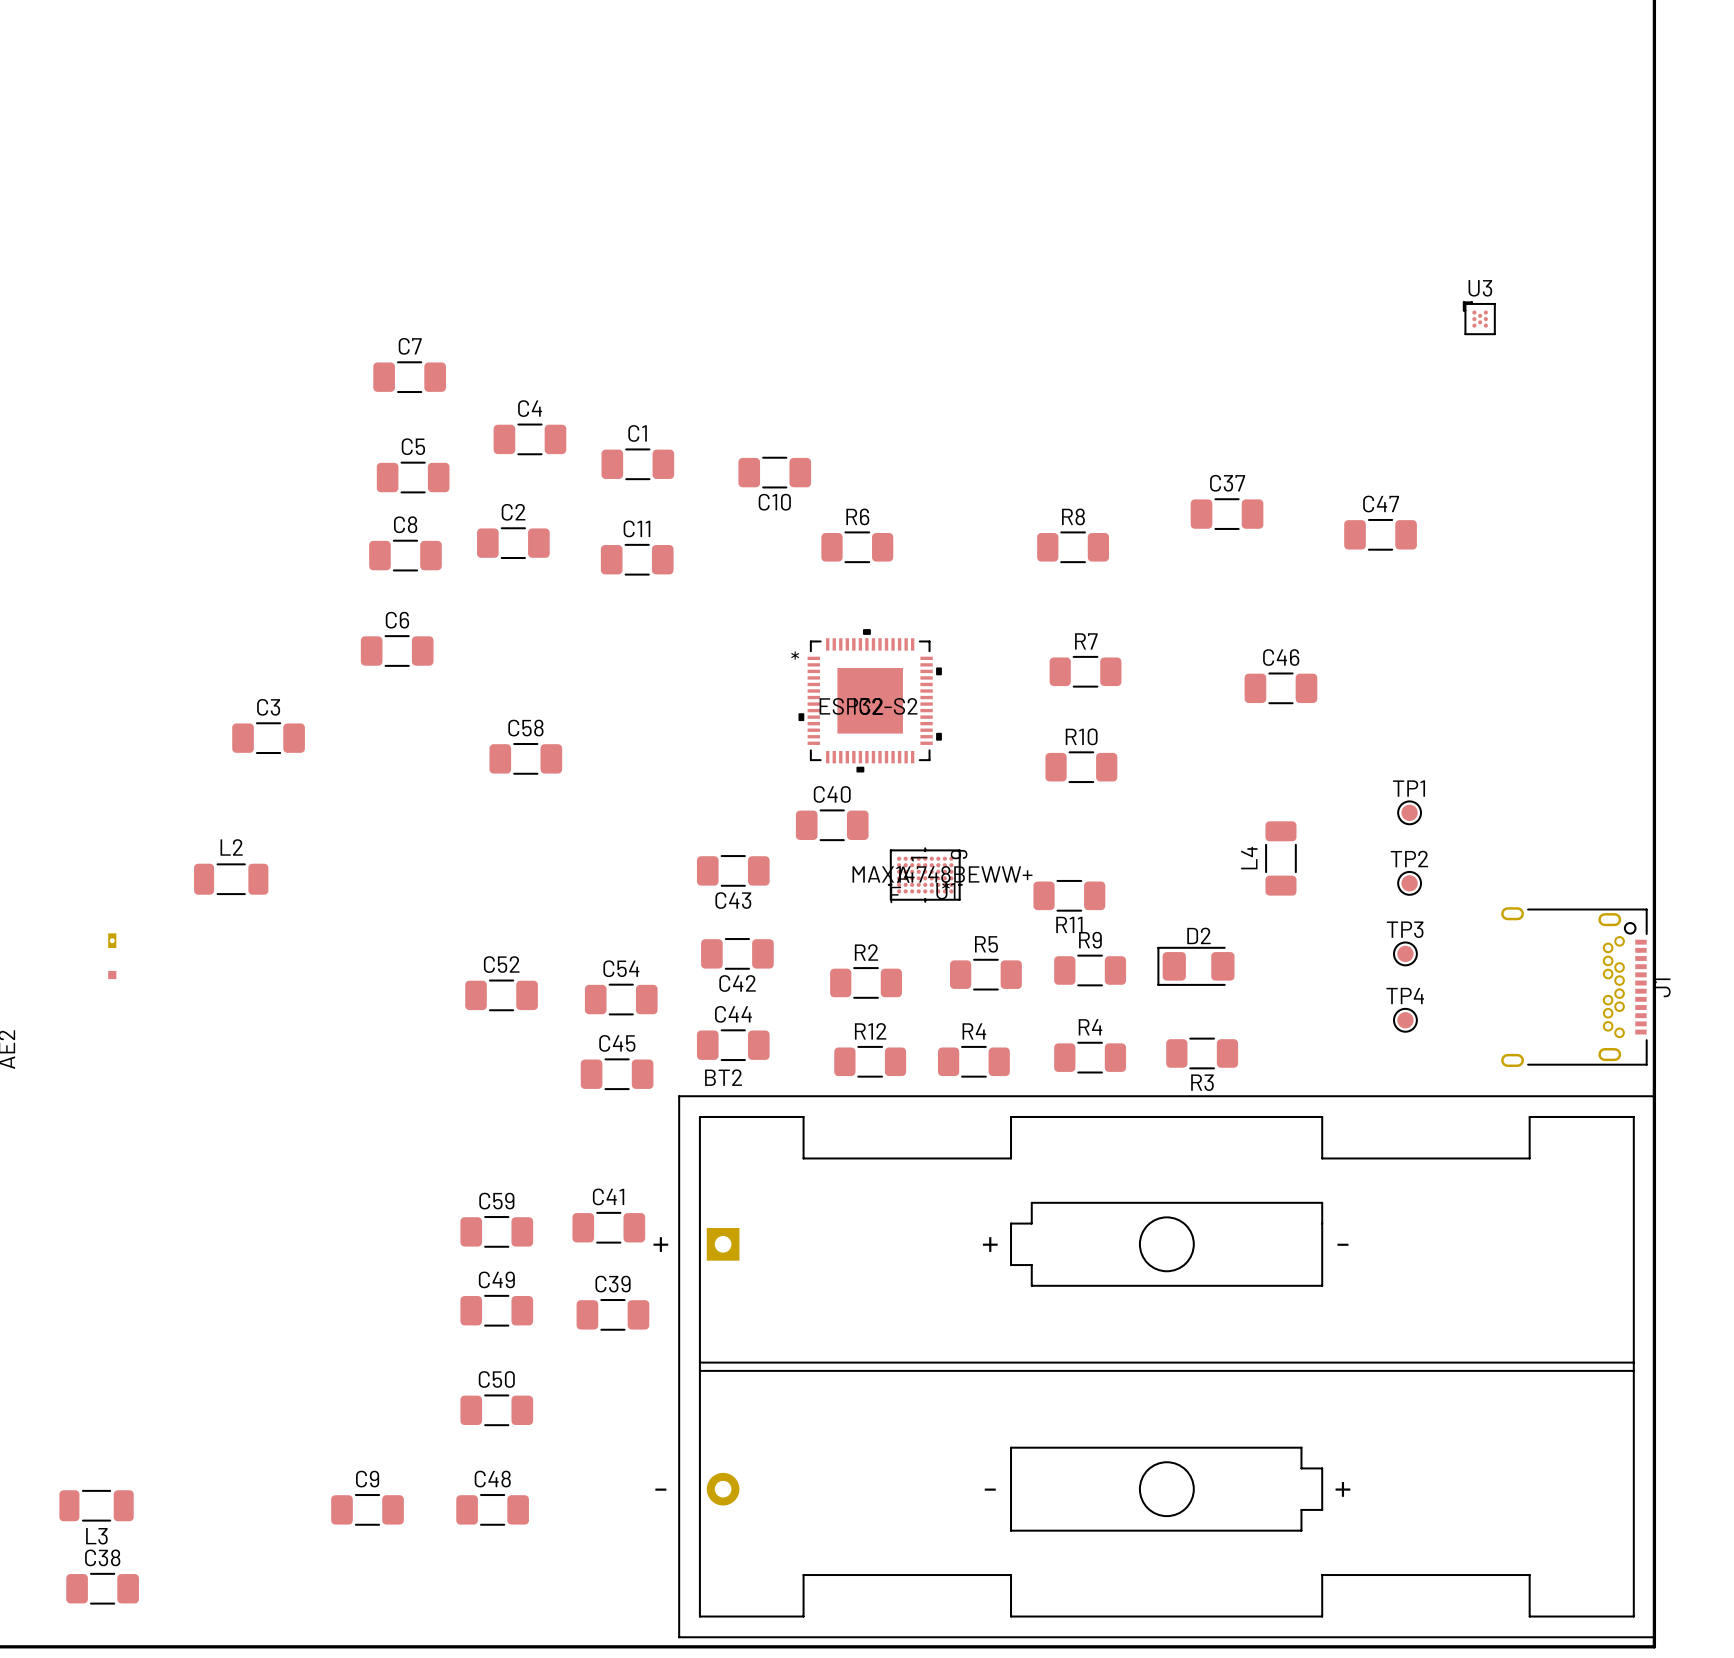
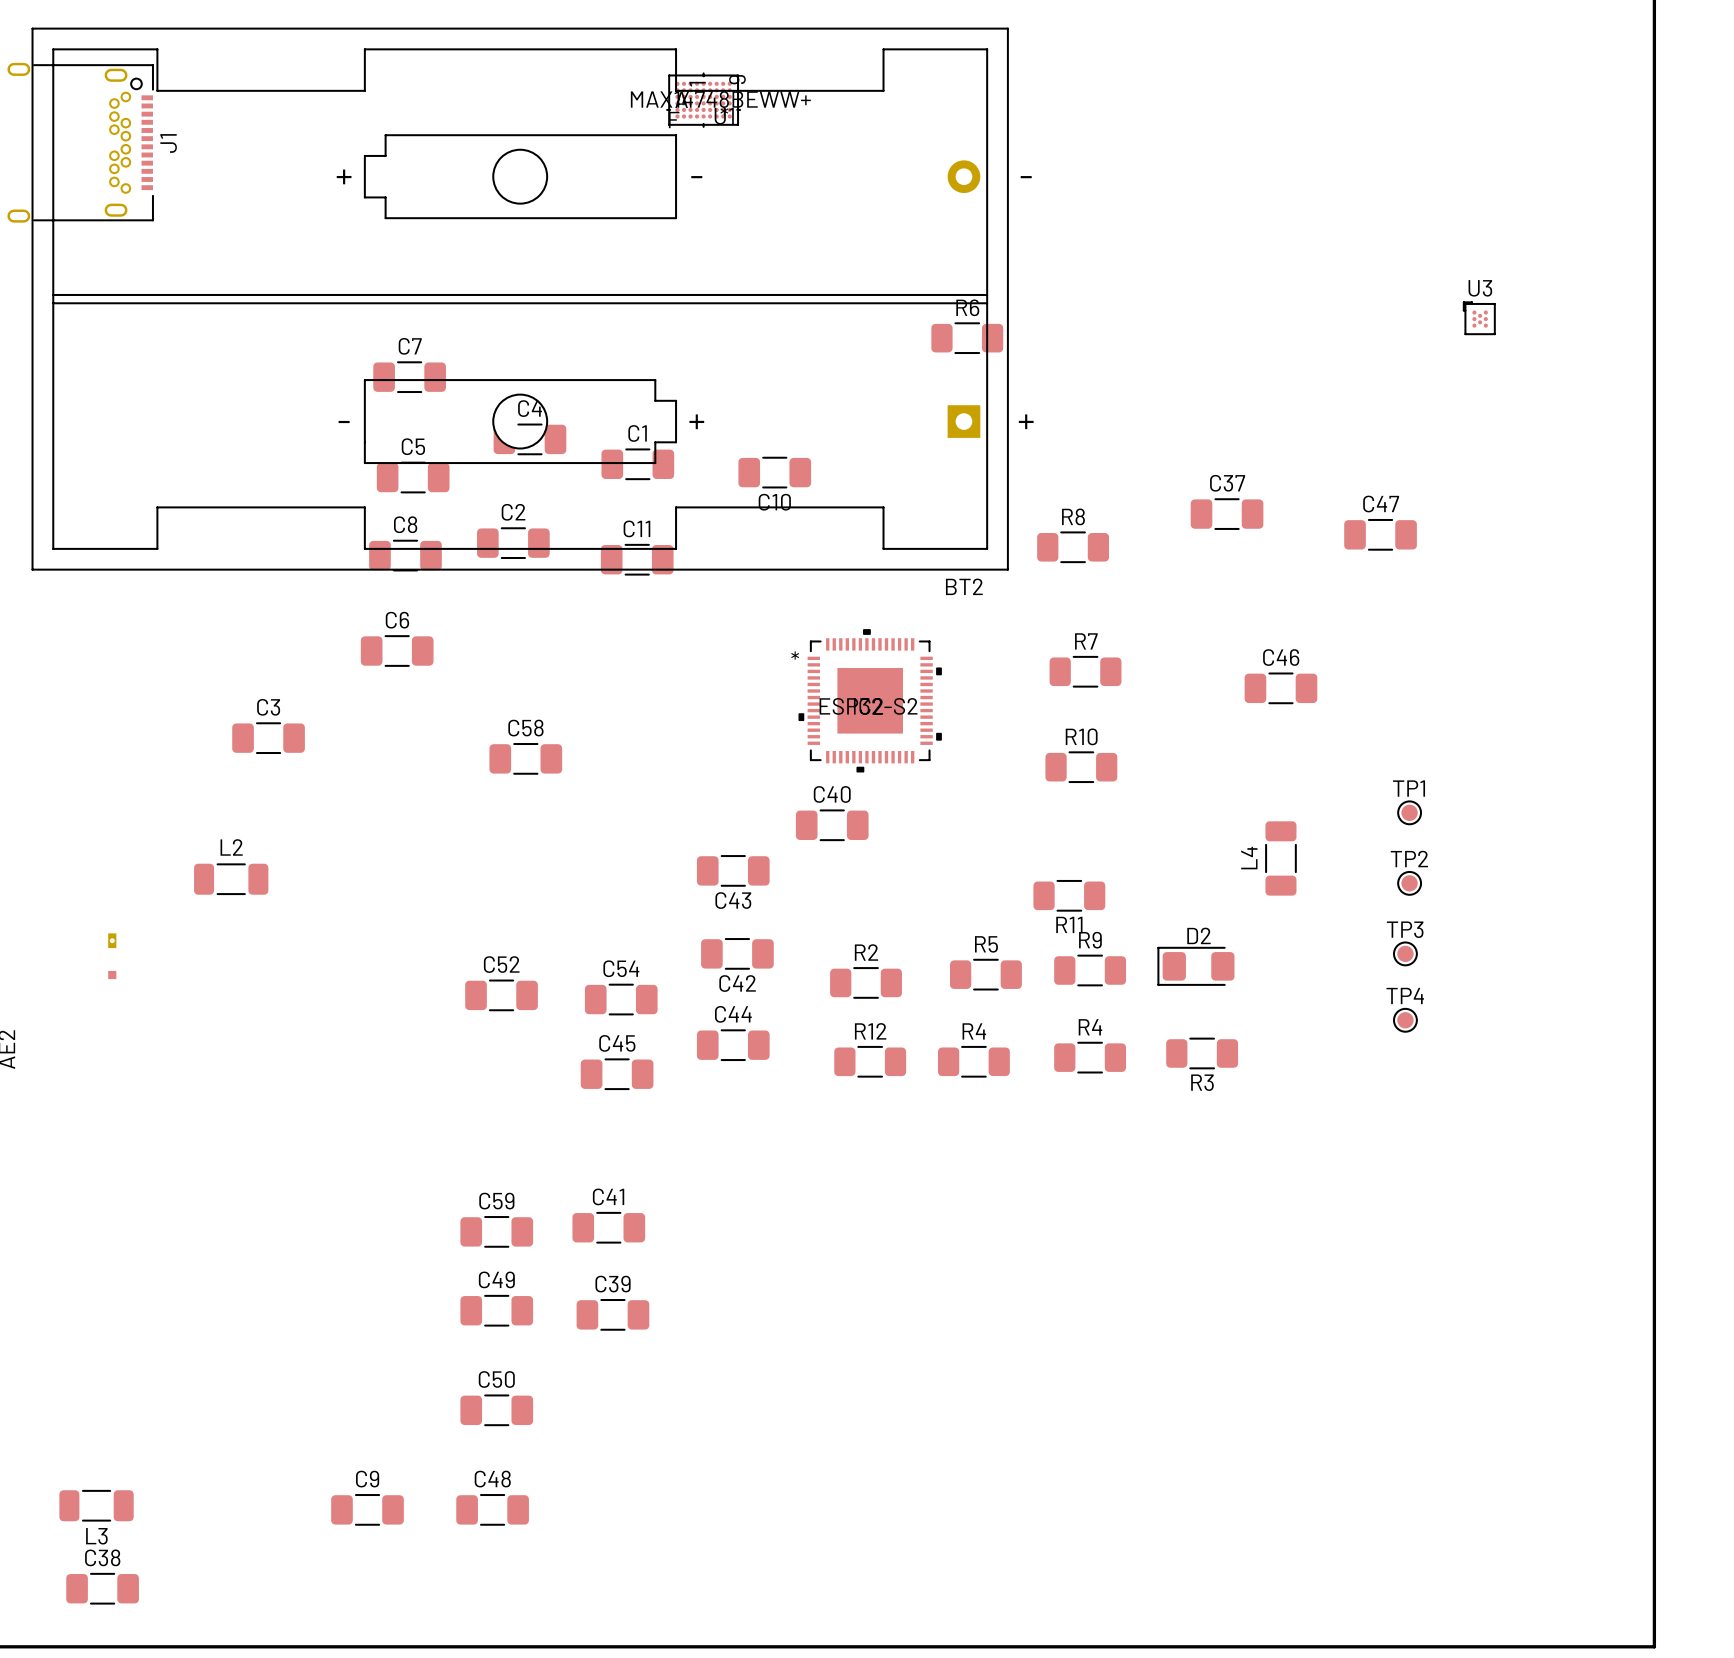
R6 position: (857, 547) -> (967, 338)
U1 position: (925, 875) -> (703, 100)
J1 position: (1574, 987) -> (80, 142)
BT2 rotation: 0° (1166, 1366) -> 180° (520, 299)
BT2 position: (1166, 1366) -> (520, 299)

